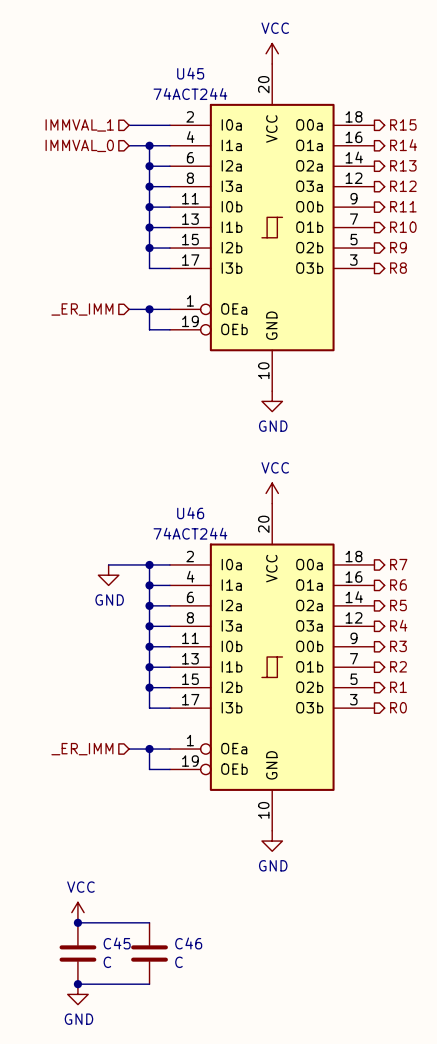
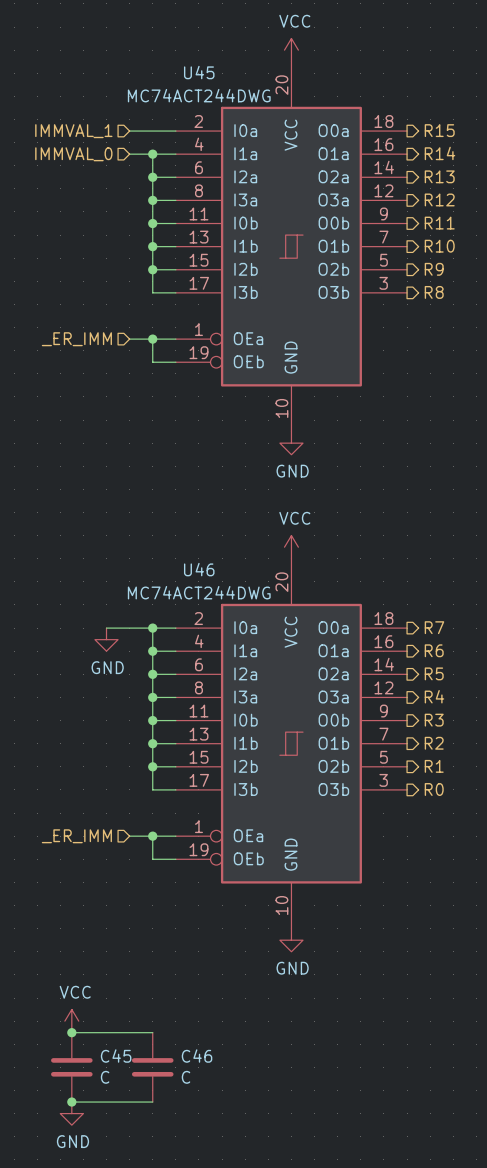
U45 value: 74ACT244 (190, 94) -> MC74ACT244DWG (199, 95)
U46 value: 74ACT244 (190, 533) -> MC74ACT244DWG (199, 592)

